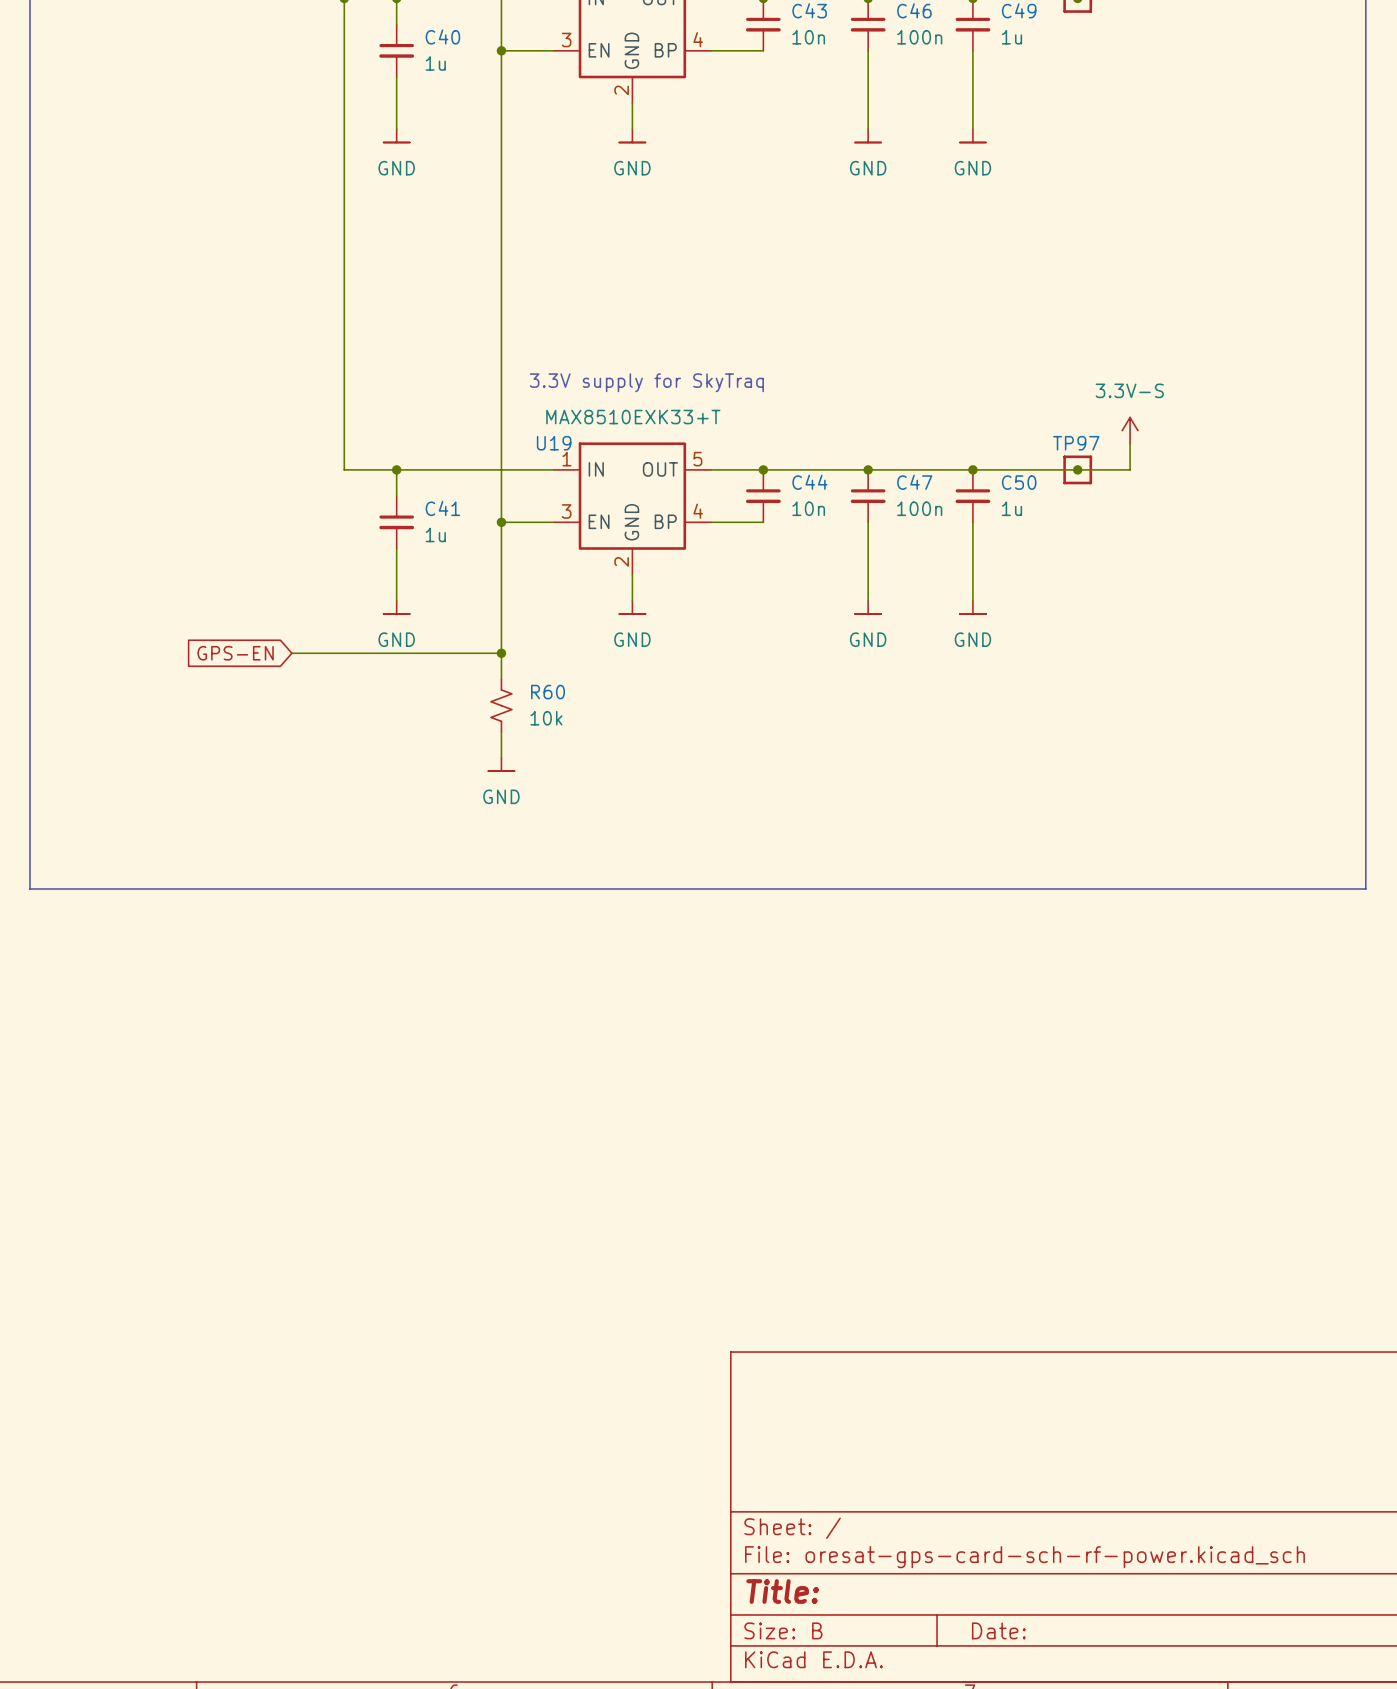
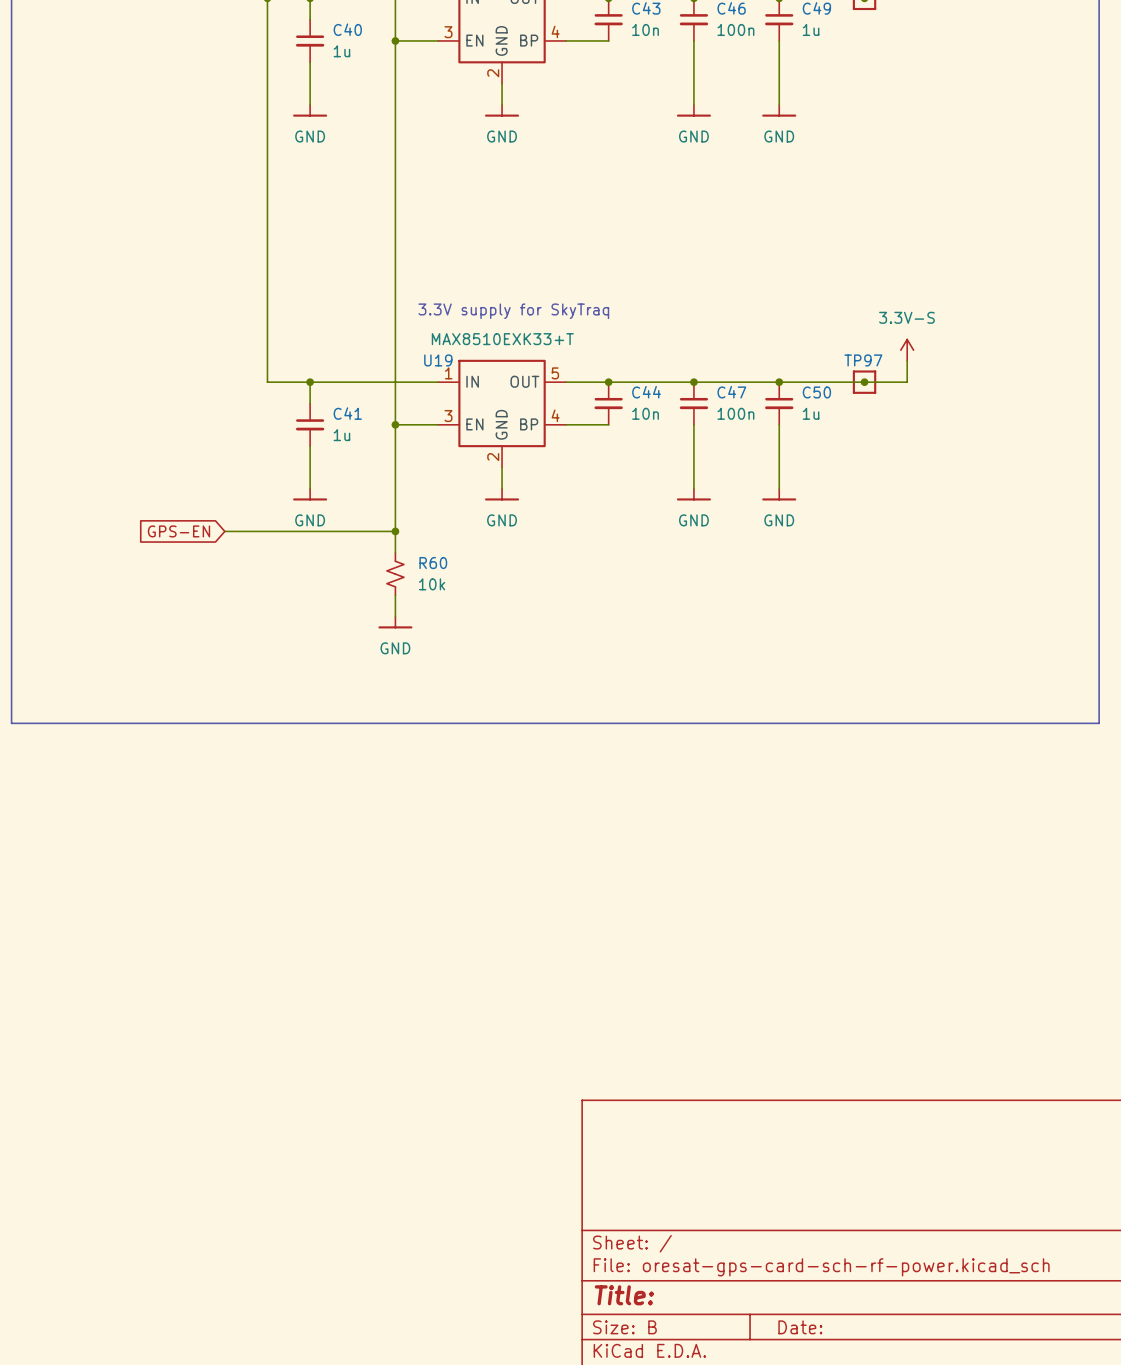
power symbol shape: [383, 129, 410, 143] -> [293, 104, 328, 117]
power symbol shape: [619, 129, 646, 143] -> [484, 104, 520, 117]
power symbol shape: [855, 129, 882, 143] -> [676, 104, 712, 117]
power symbol shape: [959, 129, 987, 143] -> [762, 104, 797, 117]
power symbol shape: [383, 600, 410, 614] -> [293, 488, 328, 501]
power symbol shape: [619, 600, 646, 614] -> [484, 488, 520, 501]
power symbol shape: [855, 600, 882, 614] -> [676, 488, 712, 501]
power symbol shape: [959, 600, 987, 614] -> [762, 488, 797, 501]
power symbol shape: [488, 758, 515, 772] -> [378, 616, 413, 629]

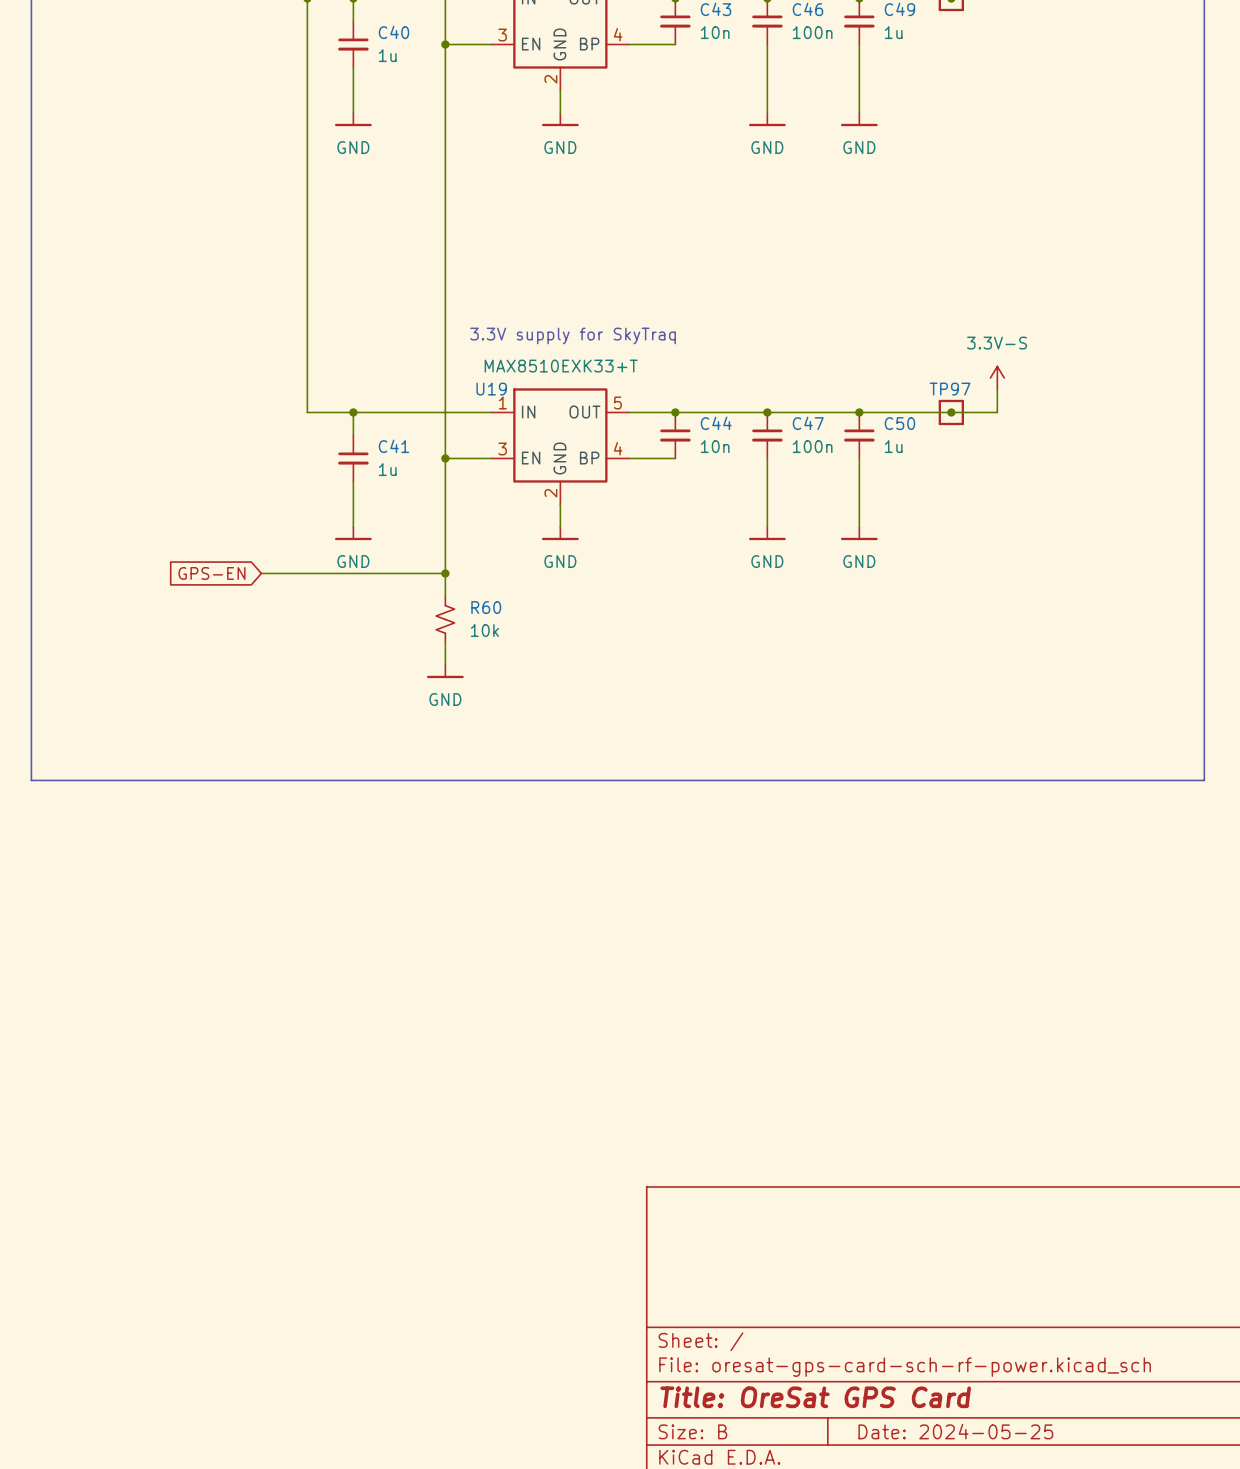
title block: Title: (624, 1295) -> Title: OreSat GPS Card (815, 1397)
title block: Date: (800, 1327) -> Date: 2024-05-25 (955, 1431)

